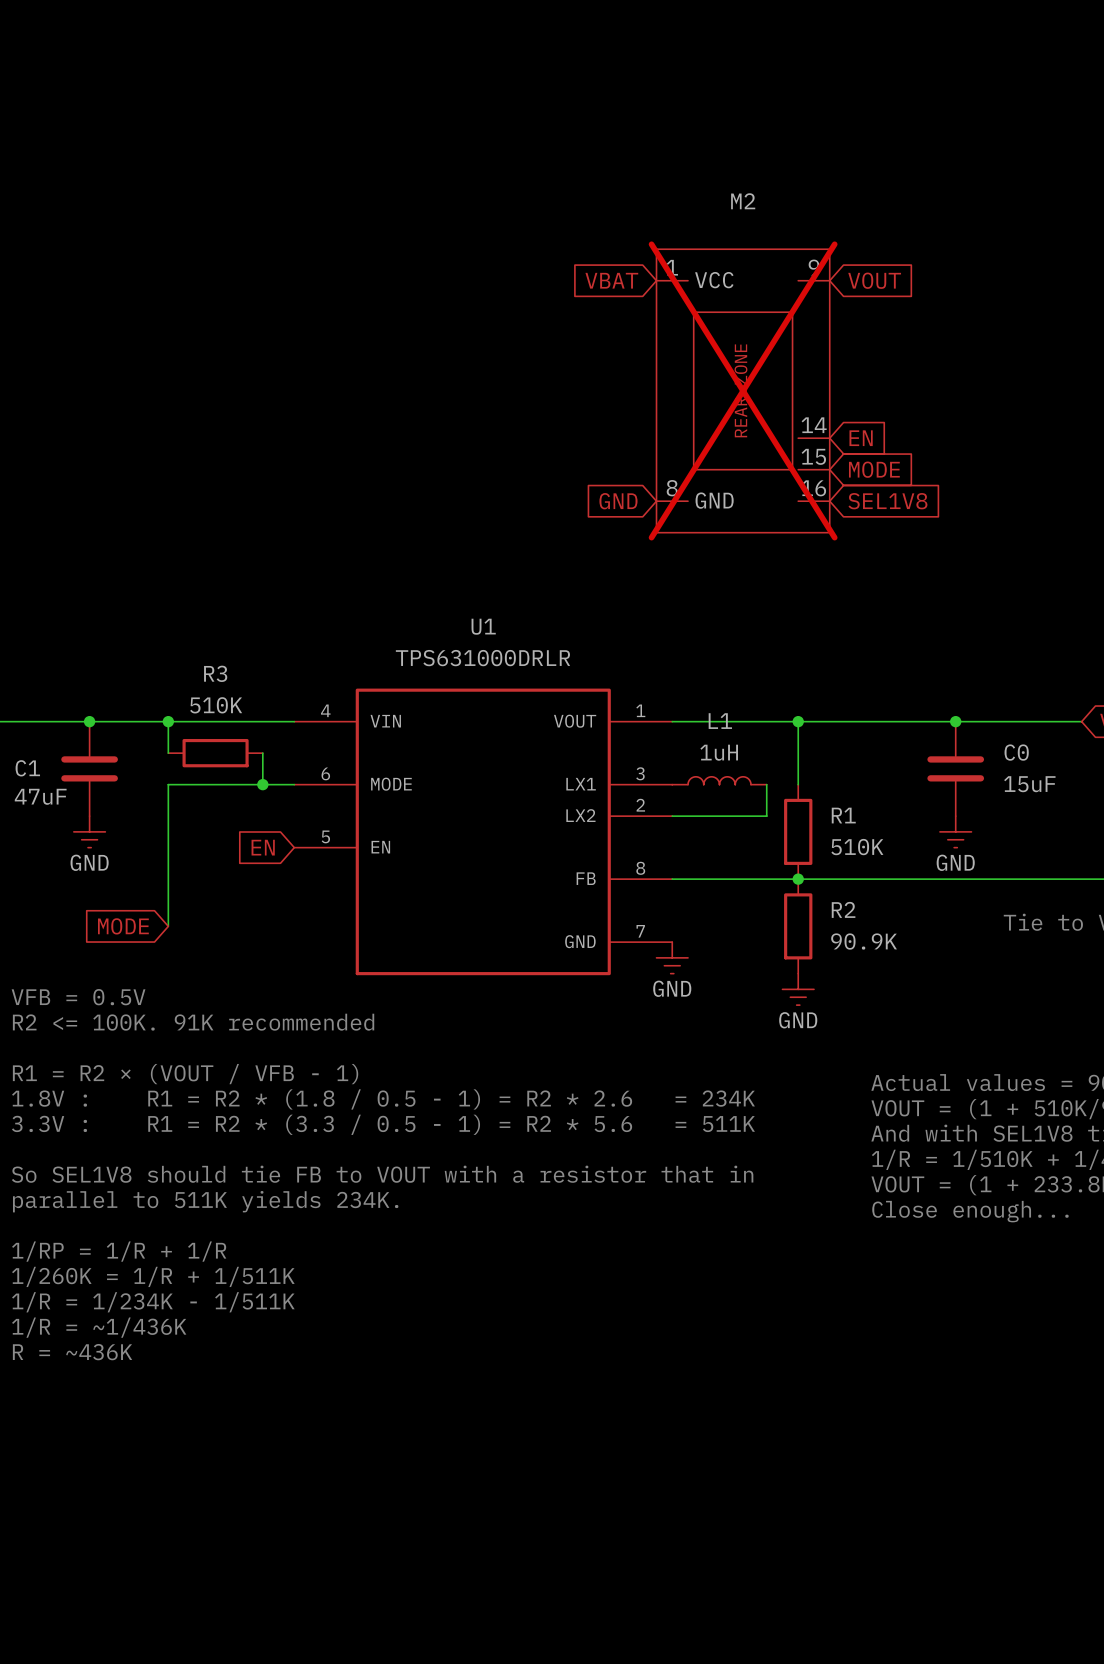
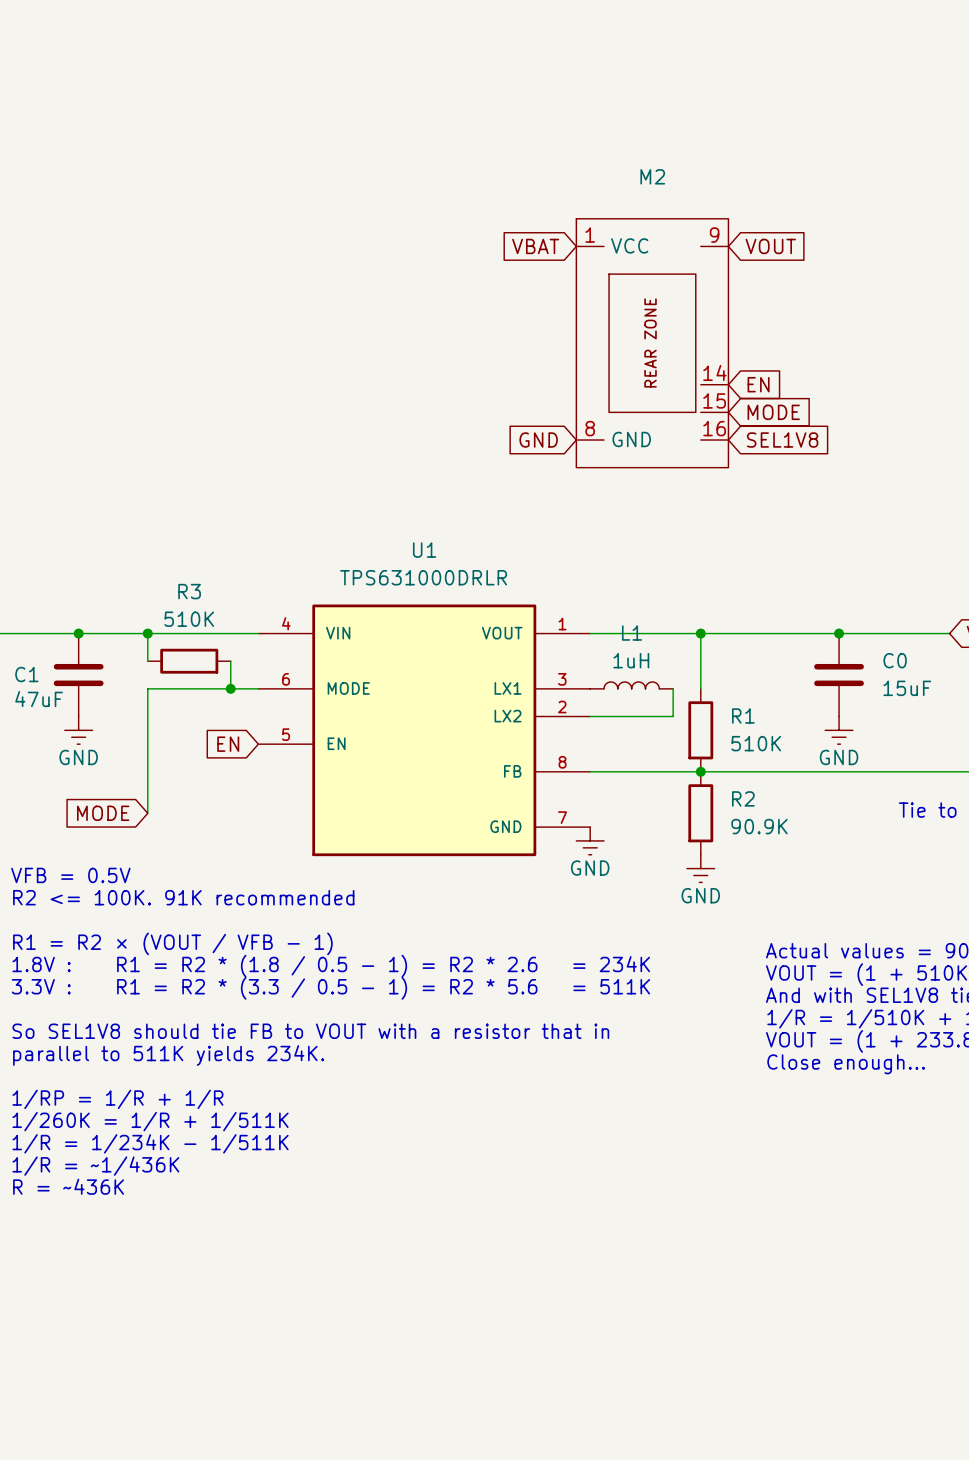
M2 do-not-place cross: (743, 390) -> none

